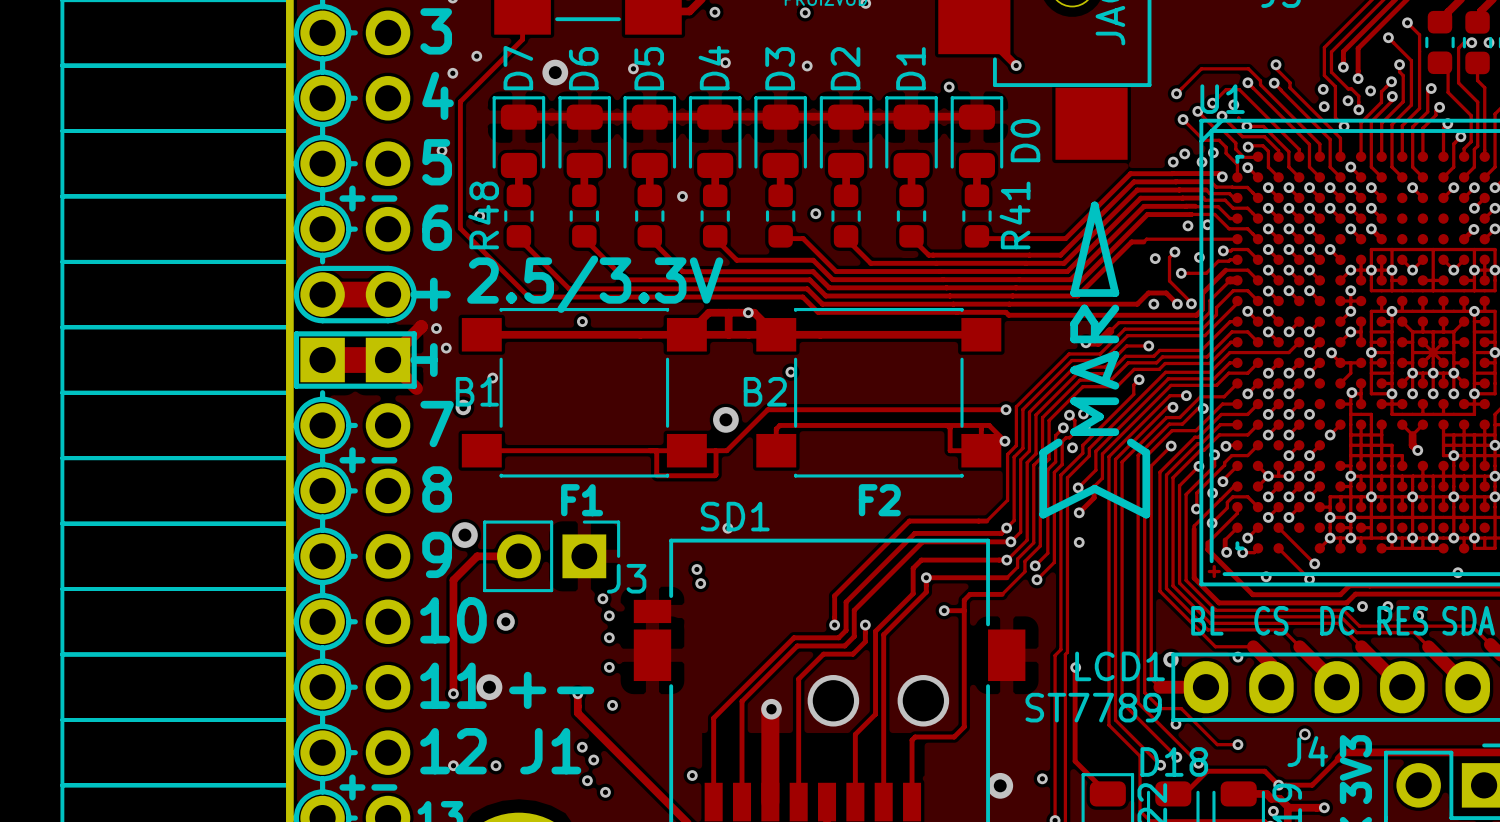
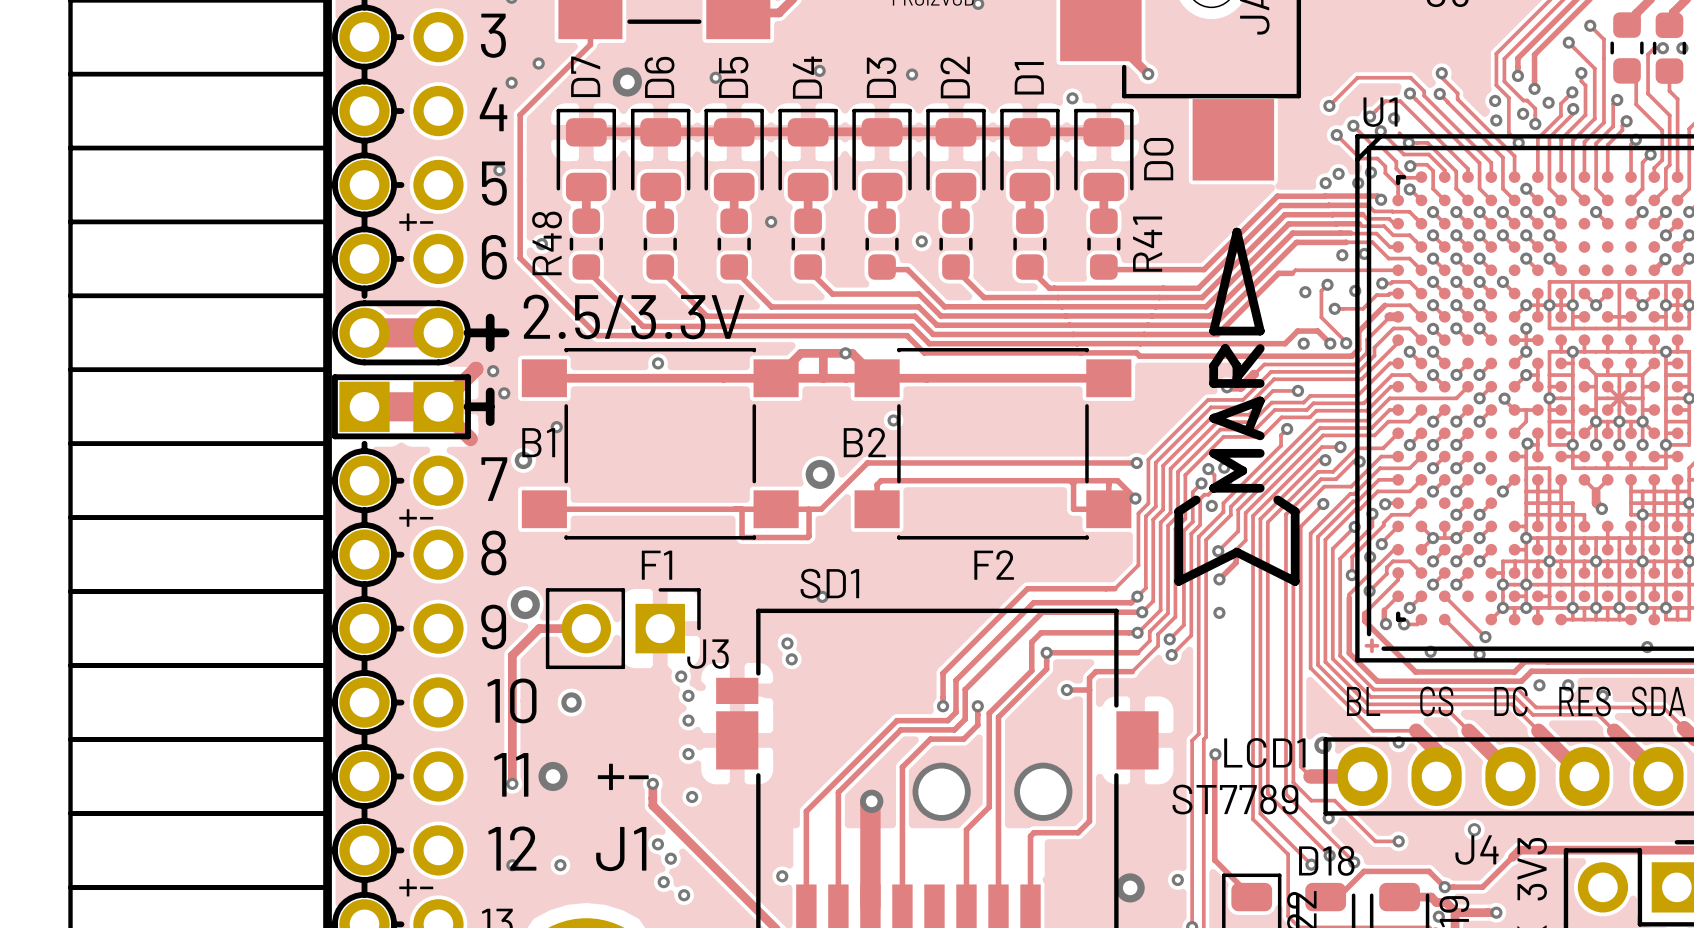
via: (714, 12) -> none
via: (805, 12) -> none

